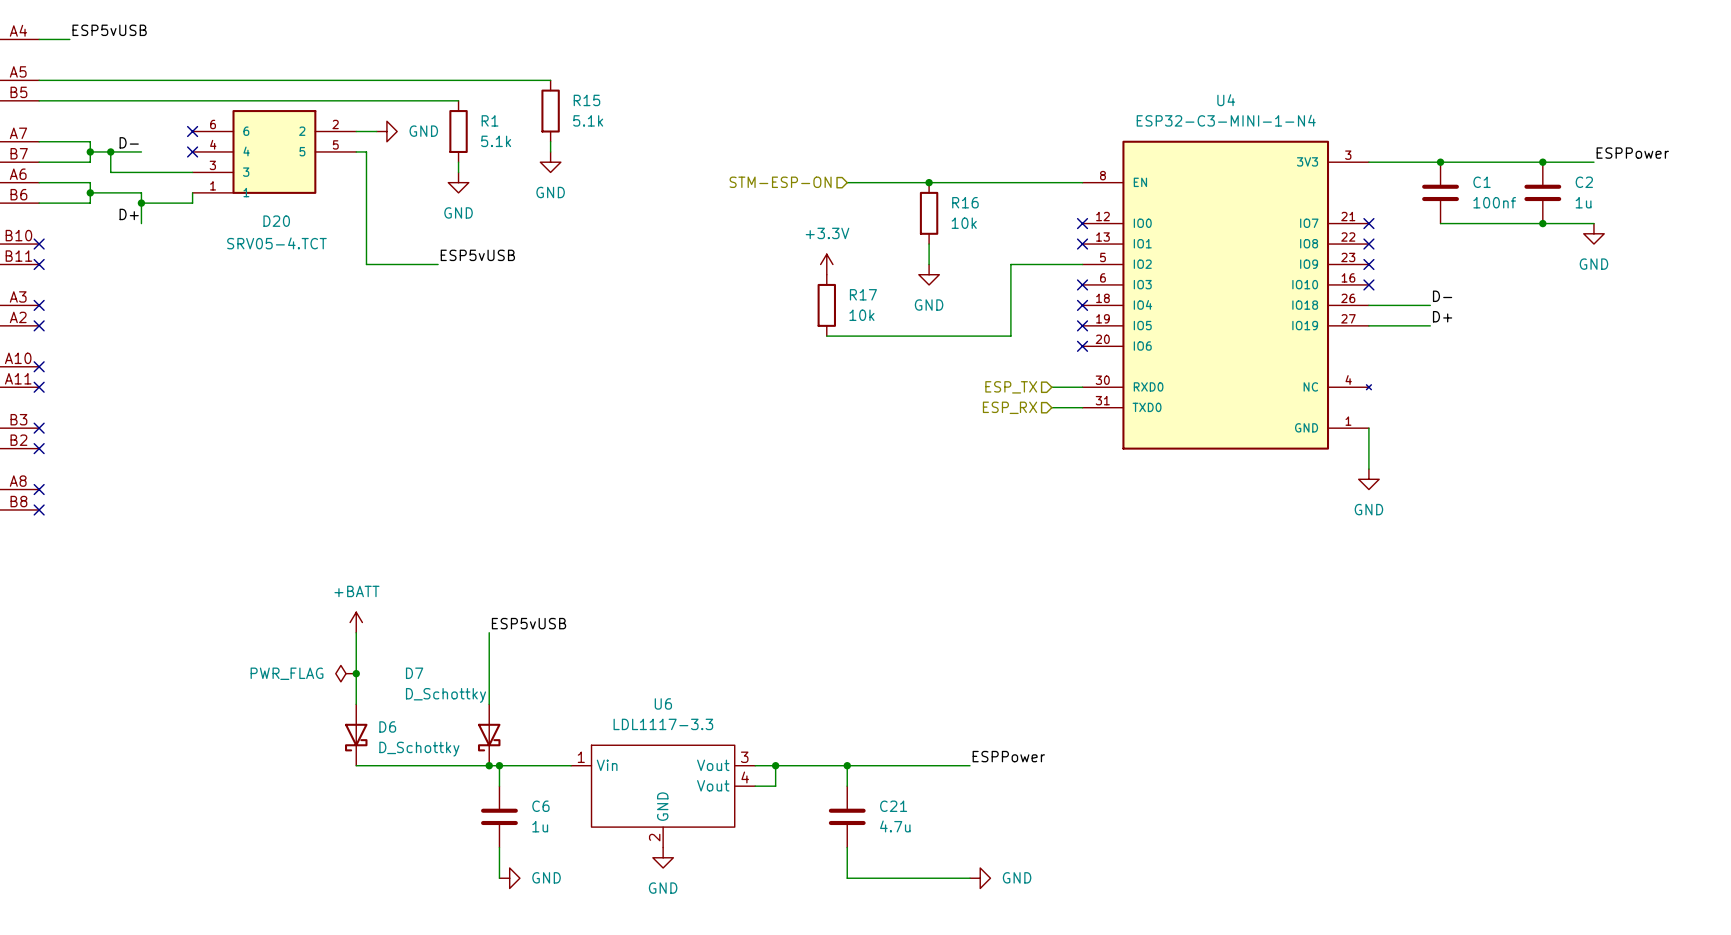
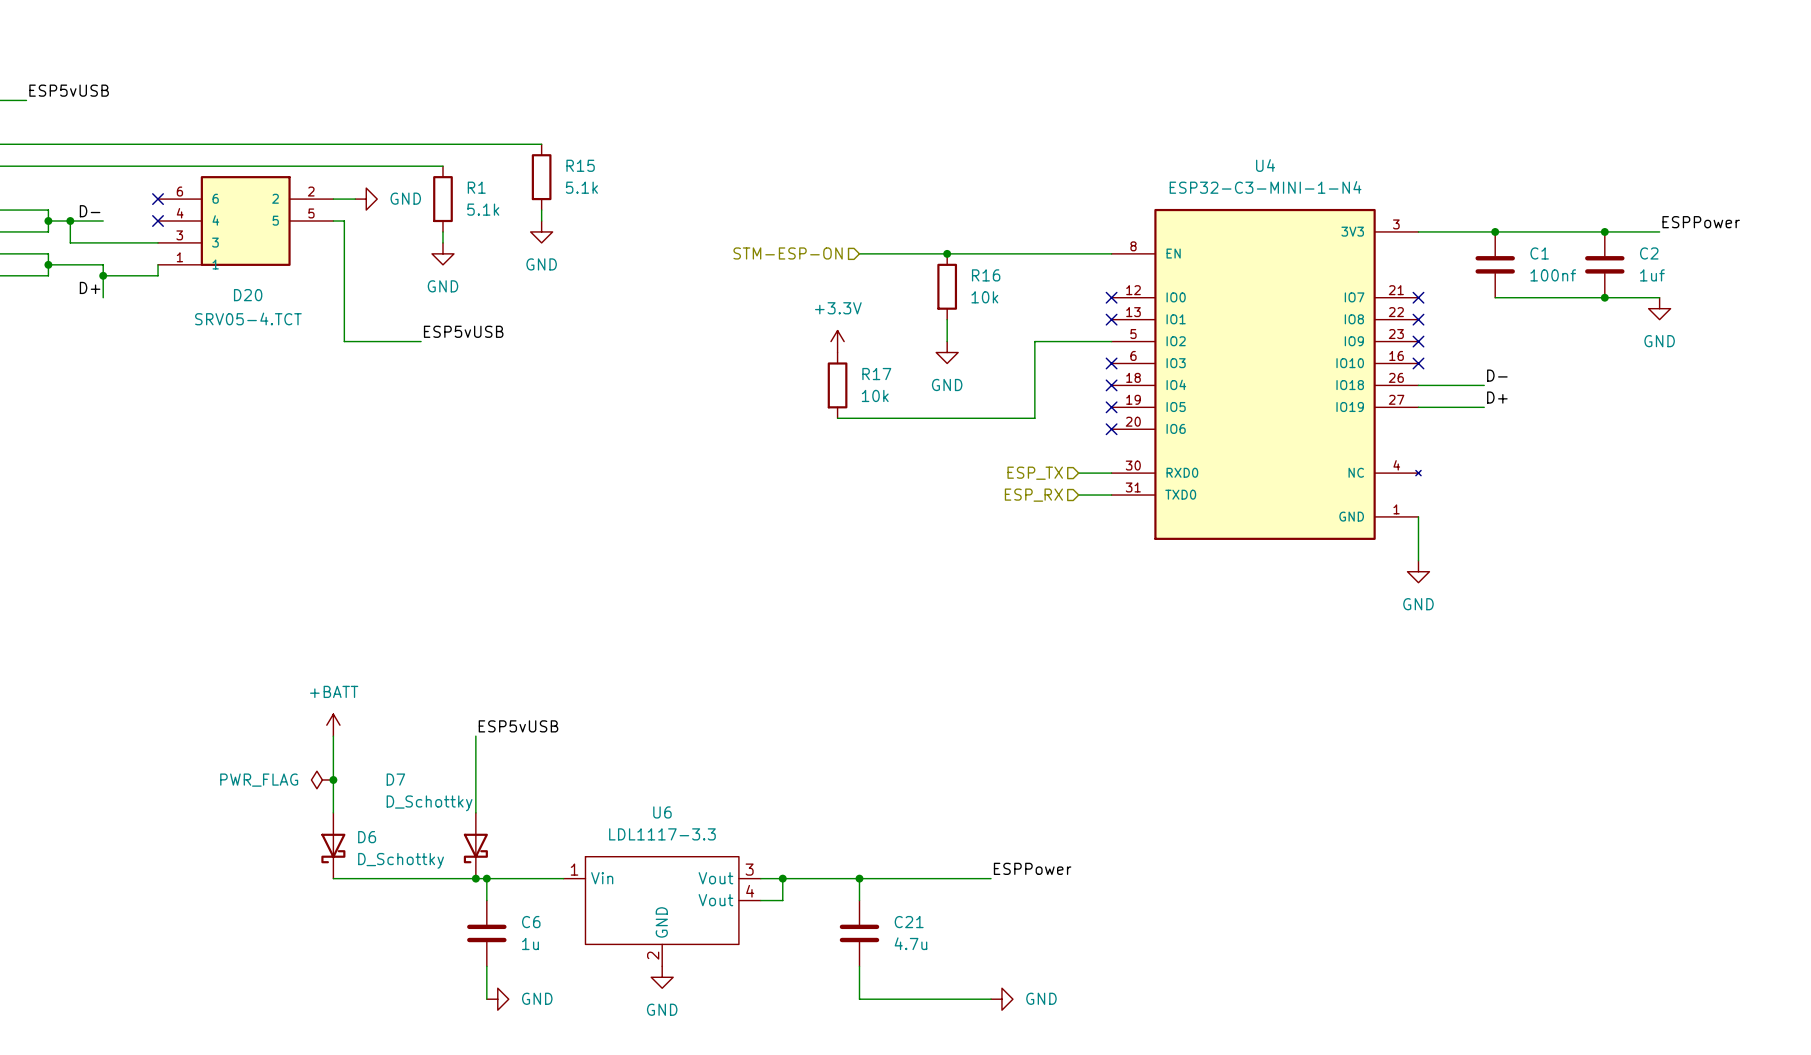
C2 value: 1u (1583, 202) -> 1uf (1652, 275)

